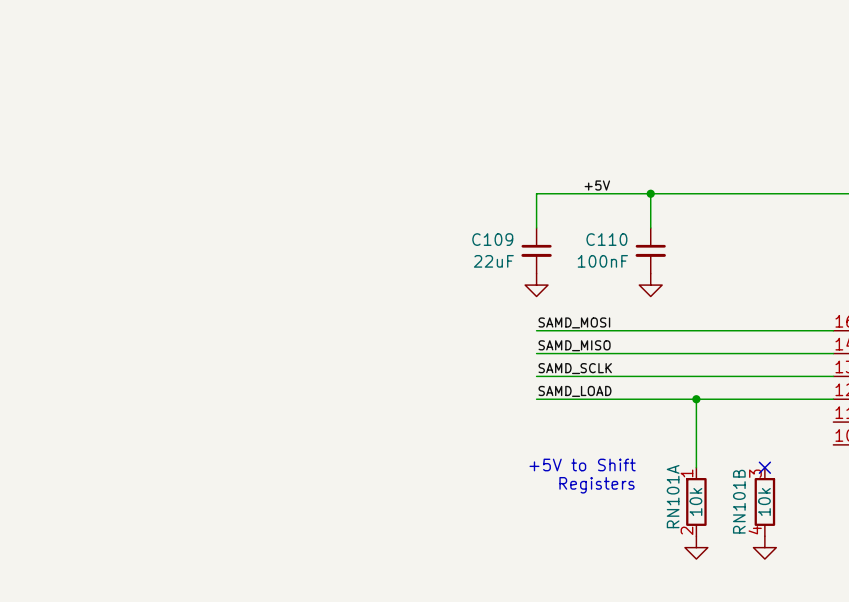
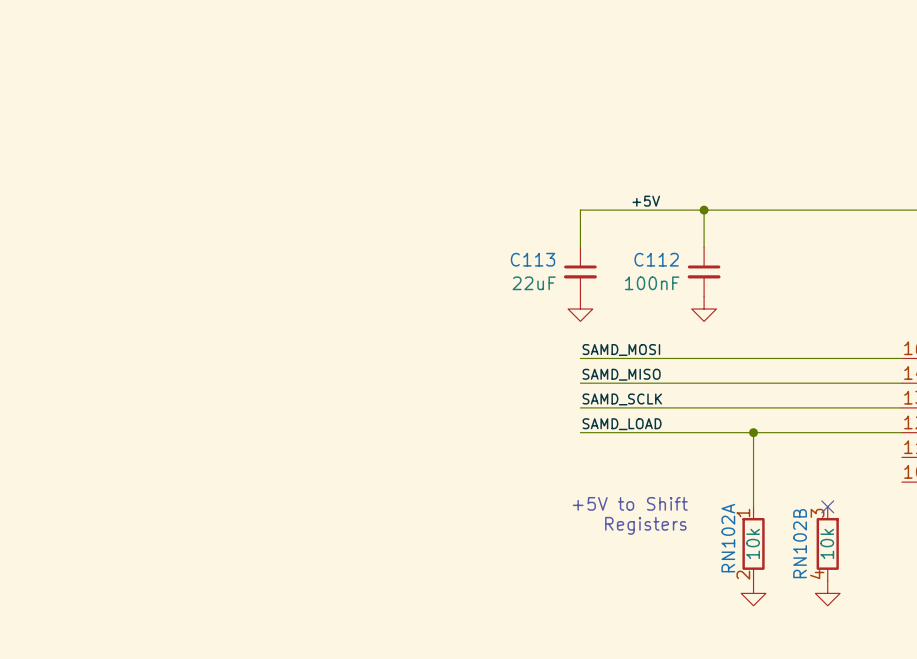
C109 name: C109 (492, 239) -> C113 (532, 259)
C110 name: C110 (606, 239) -> C112 (656, 259)
RN101A name: RN101A (673, 496) -> RN102A (728, 538)
RN101B name: RN101B (739, 501) -> RN102B (800, 543)

